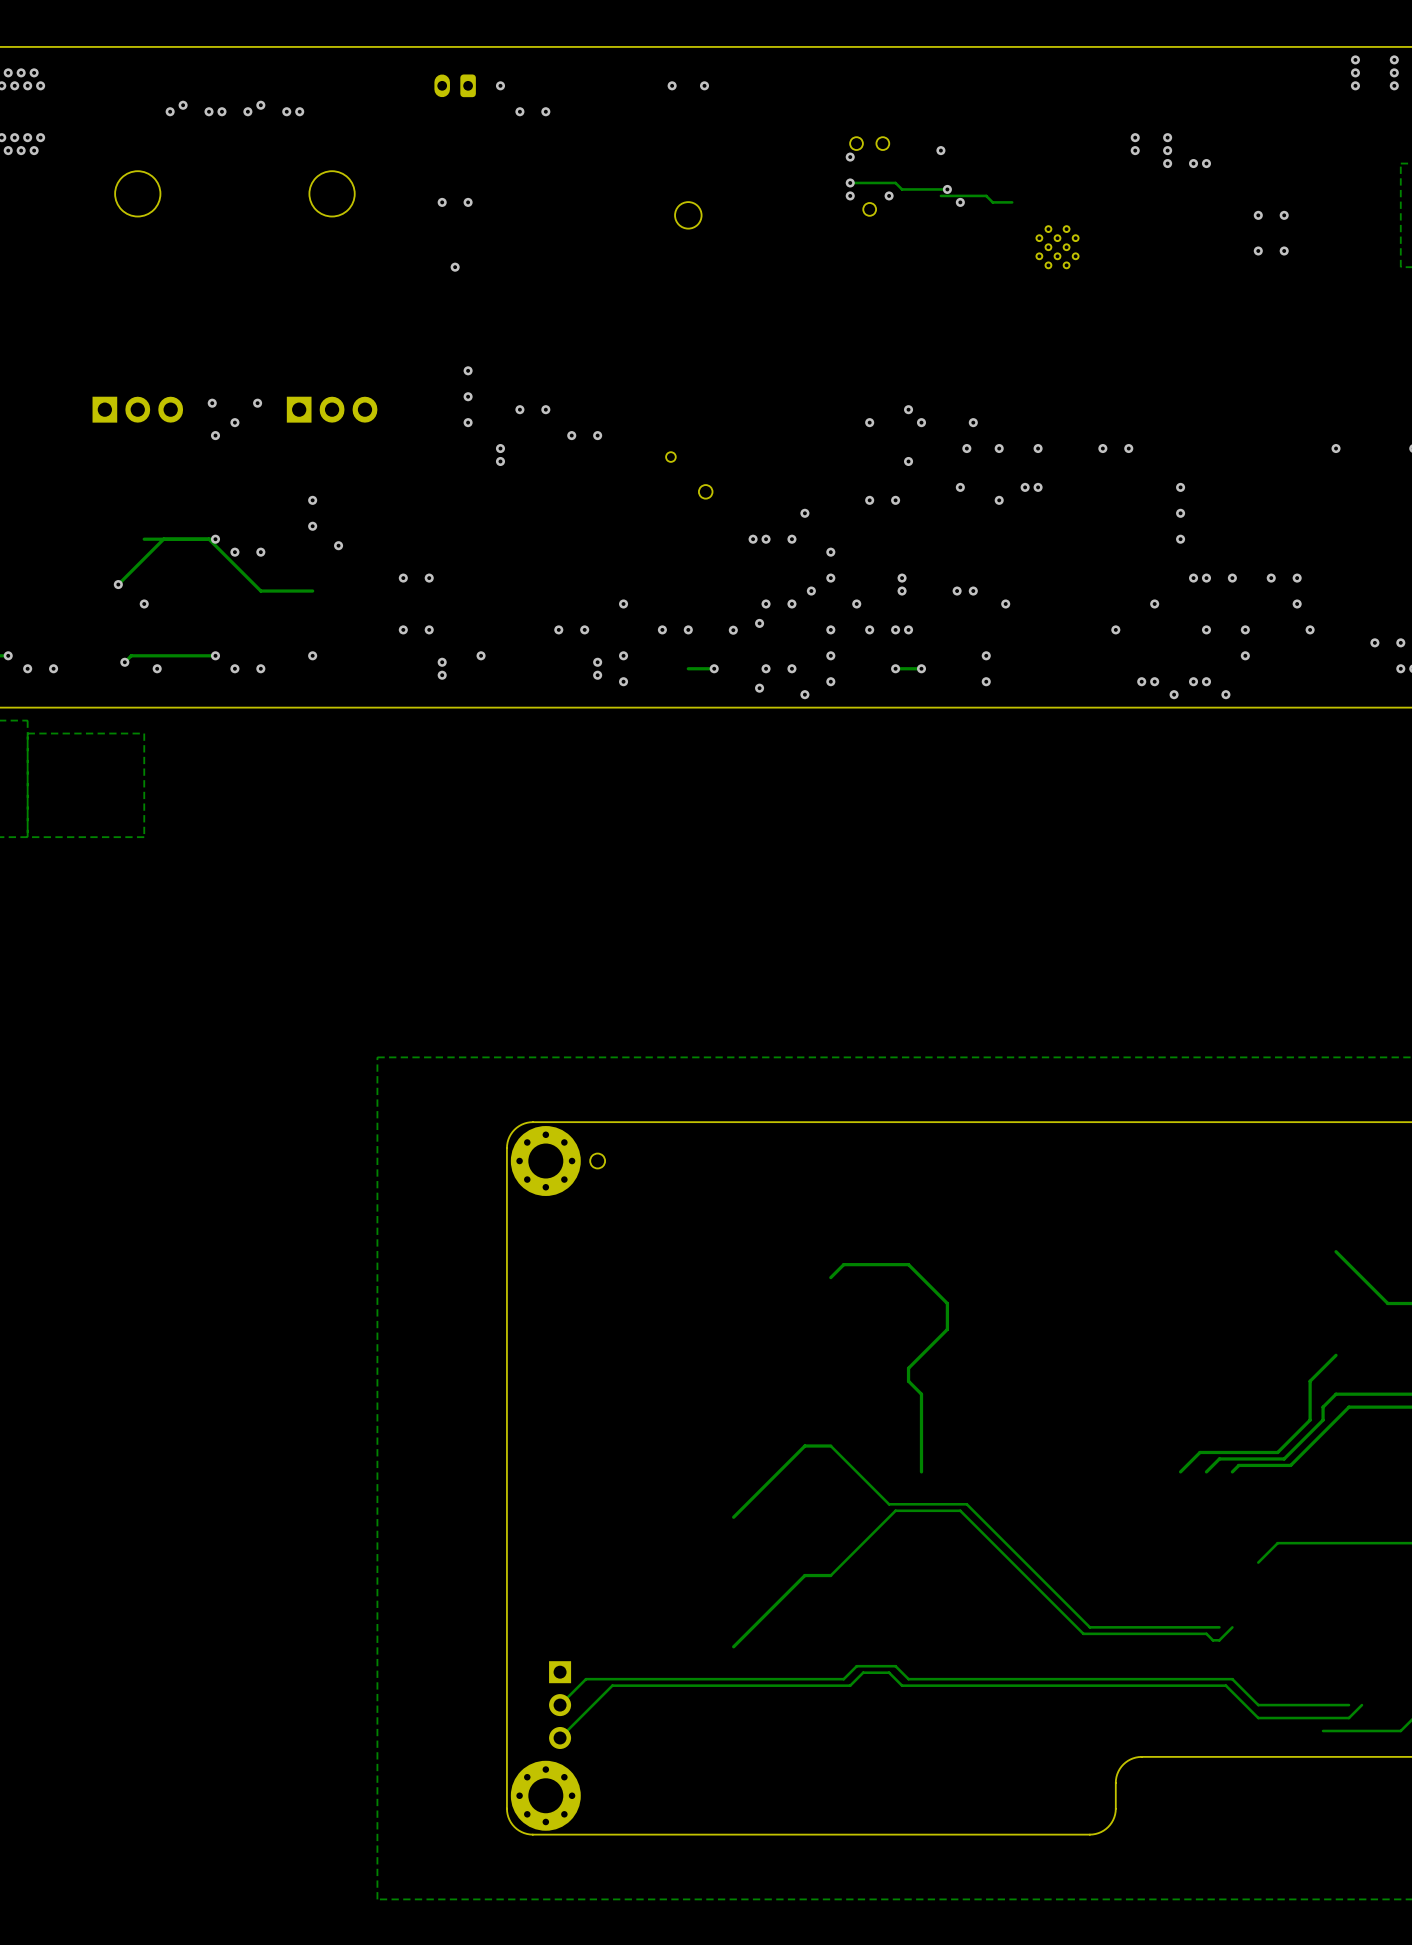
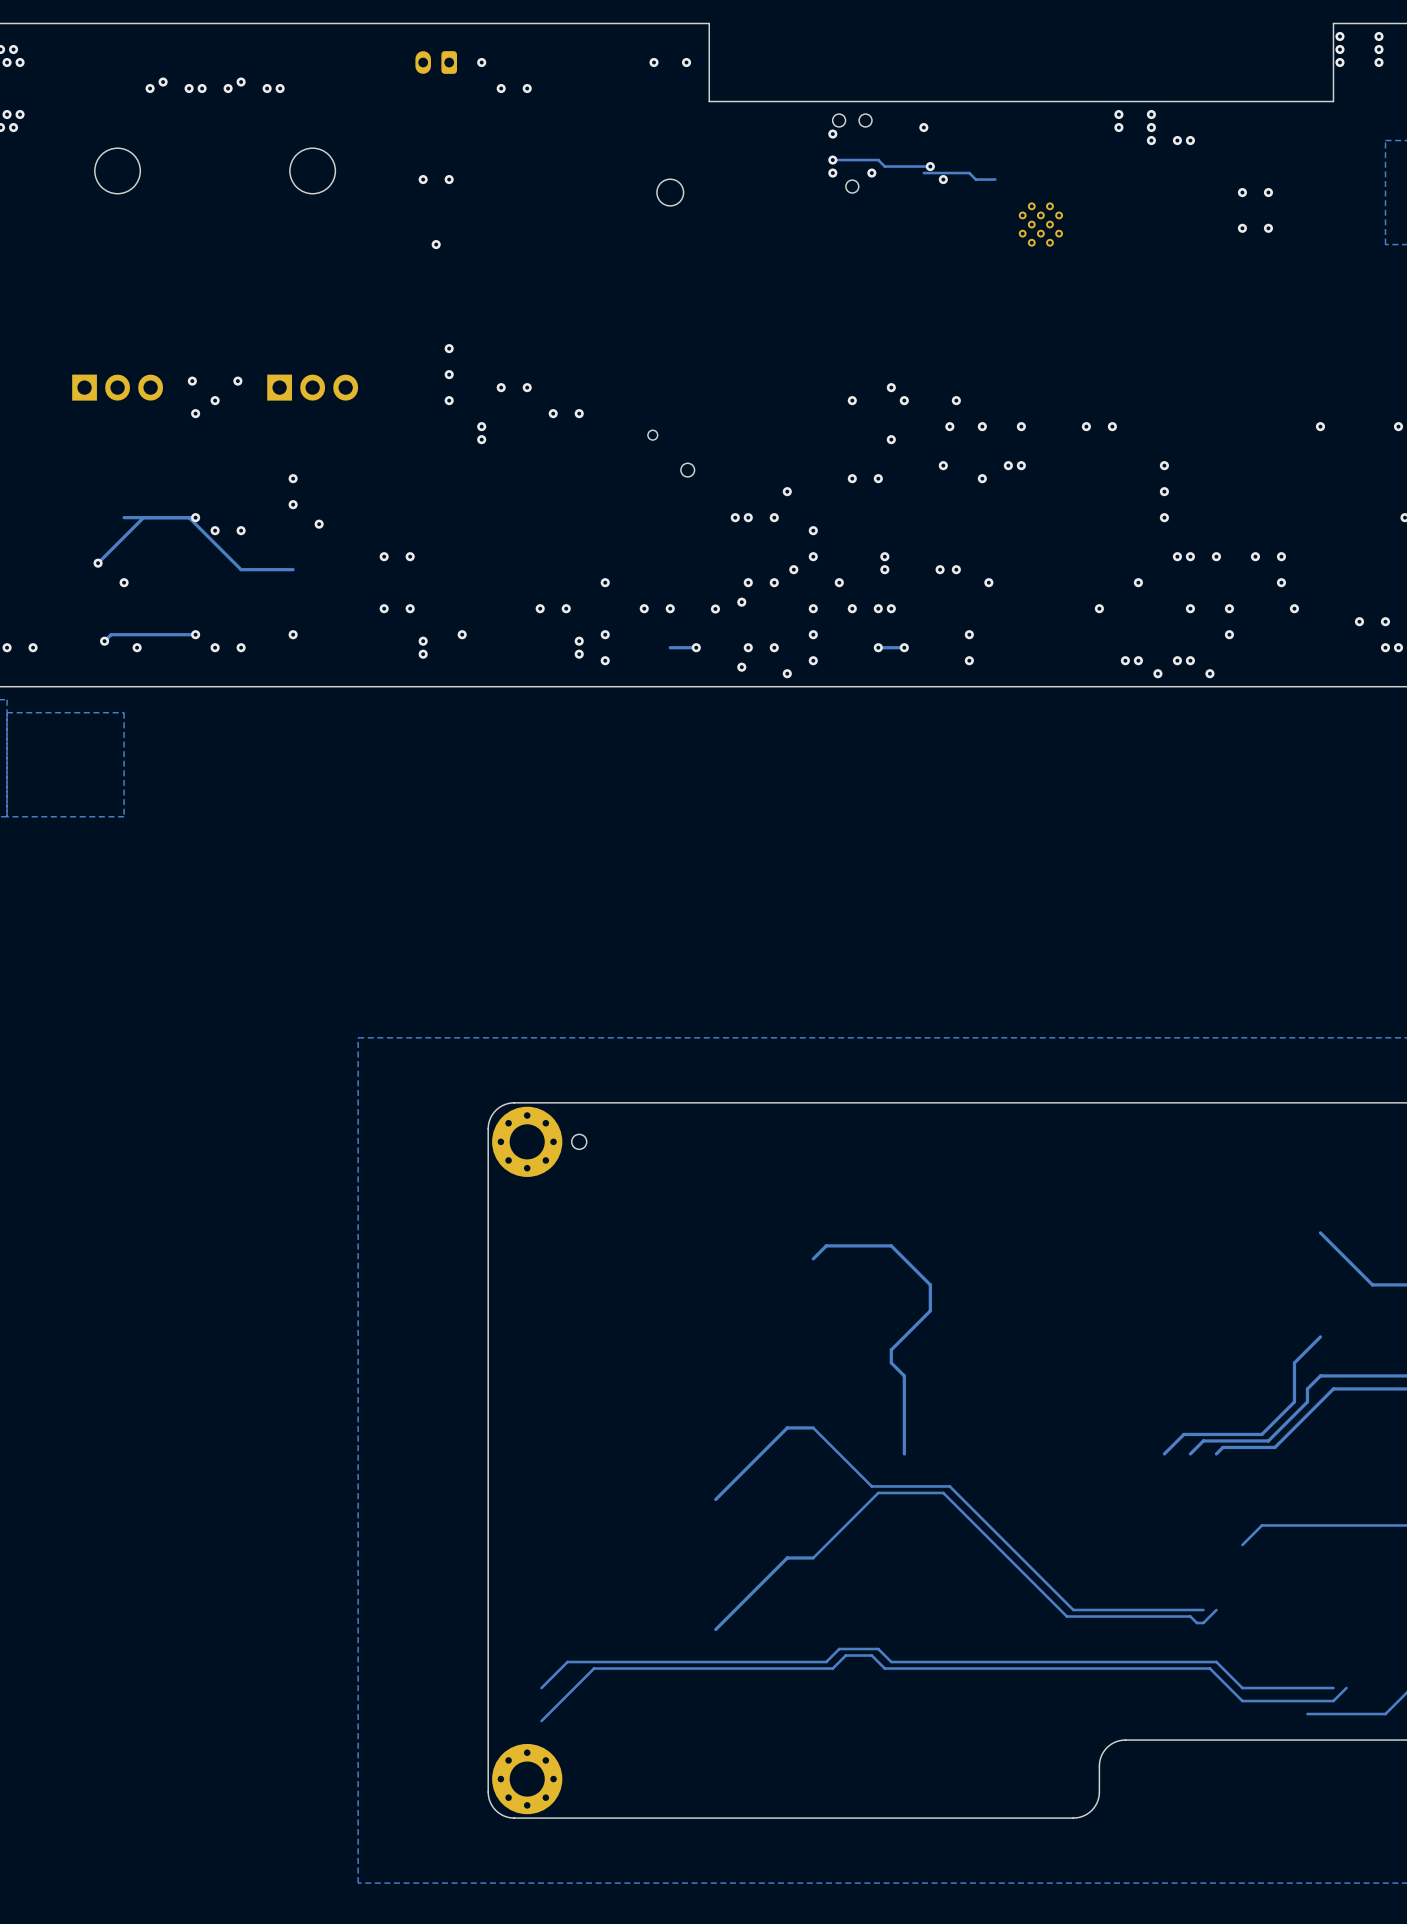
board edge: (1348, 46) (727, 46) -> (1333, 23) (1333, 101) (709, 101) (709, 23)
part: (560, 1705) -> none

